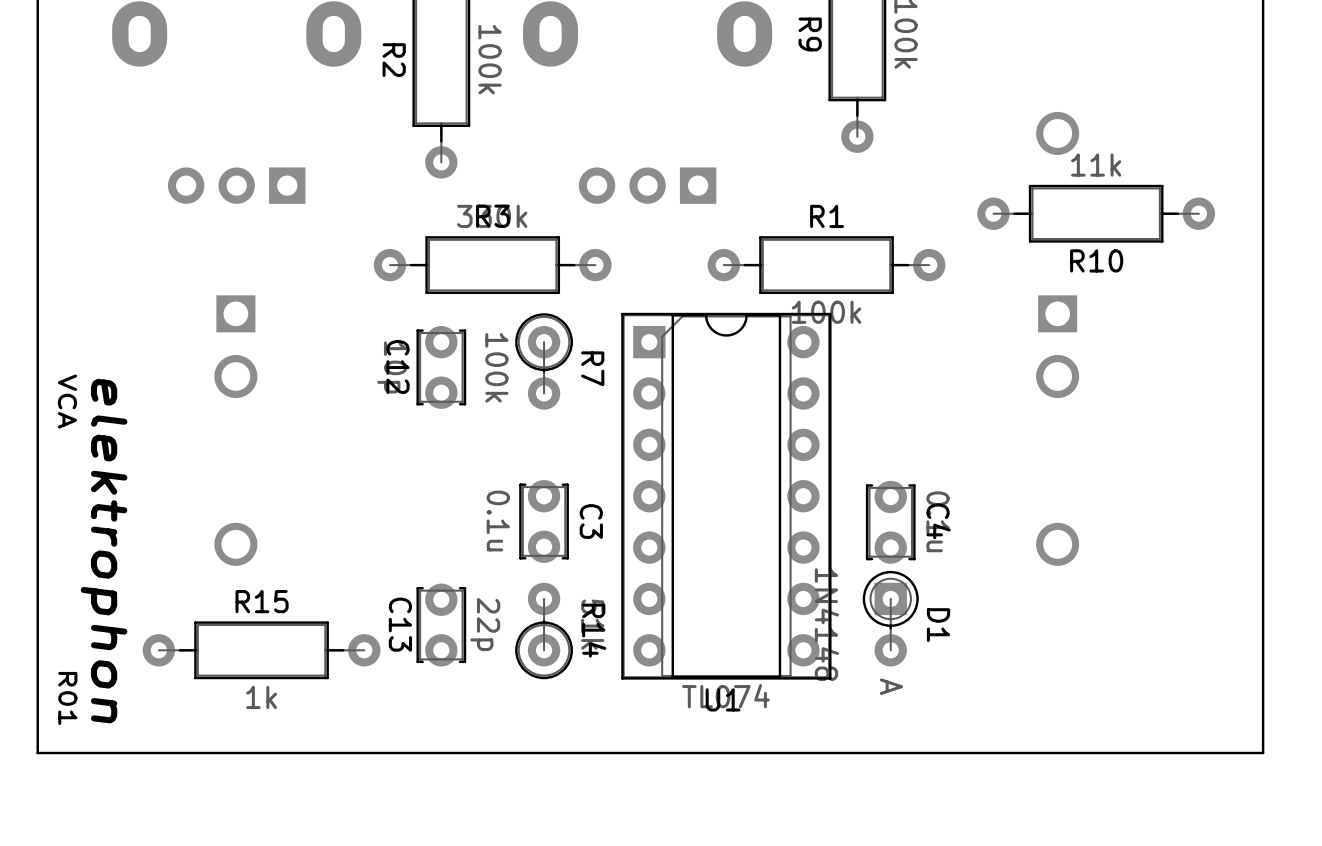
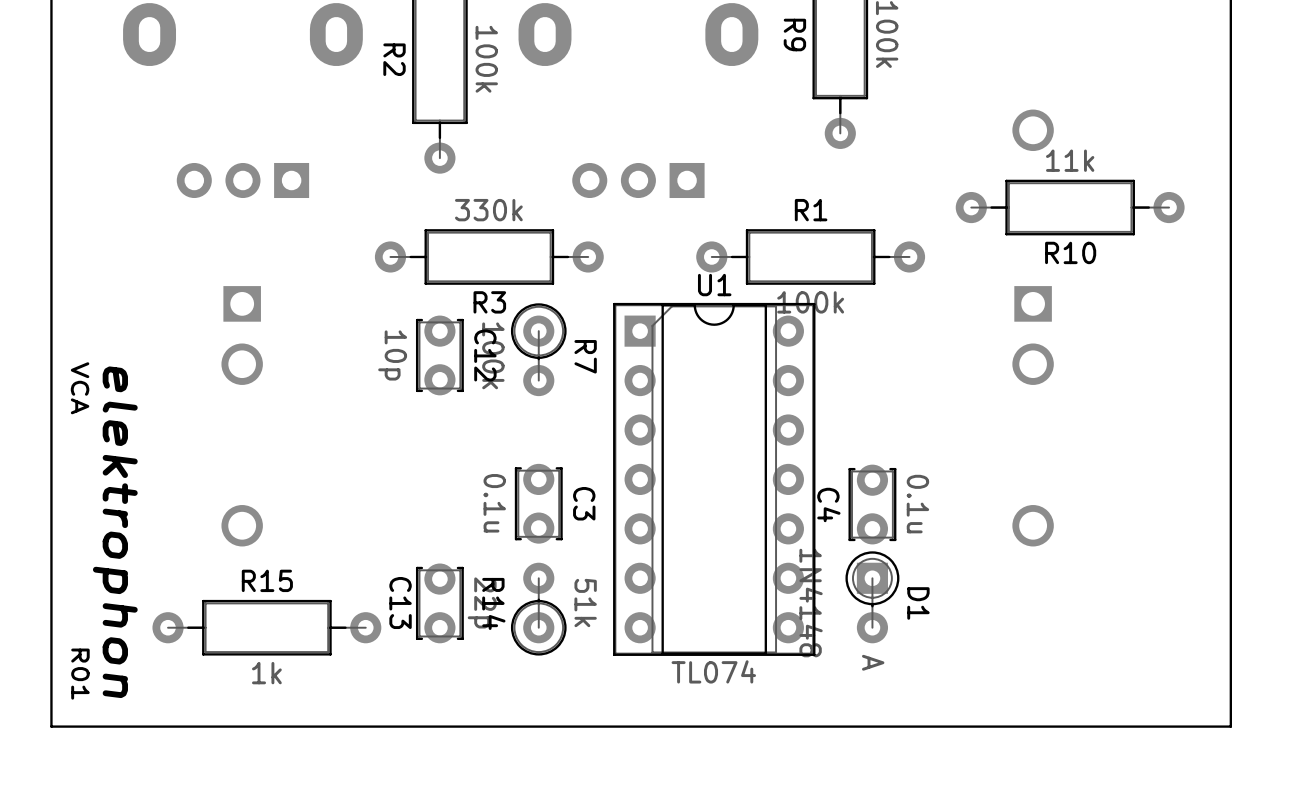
R3 name position: R3 (492, 216) -> R3 (489, 302)
C12 name position: C12 (398, 367) -> C12 (485, 355)
C4 name position: C4 (938, 521) -> C4 (828, 505)
R14 name position: R14 (594, 630) -> R14 (493, 603)
U1 name position: U1 (723, 699) -> U1 (714, 285)

